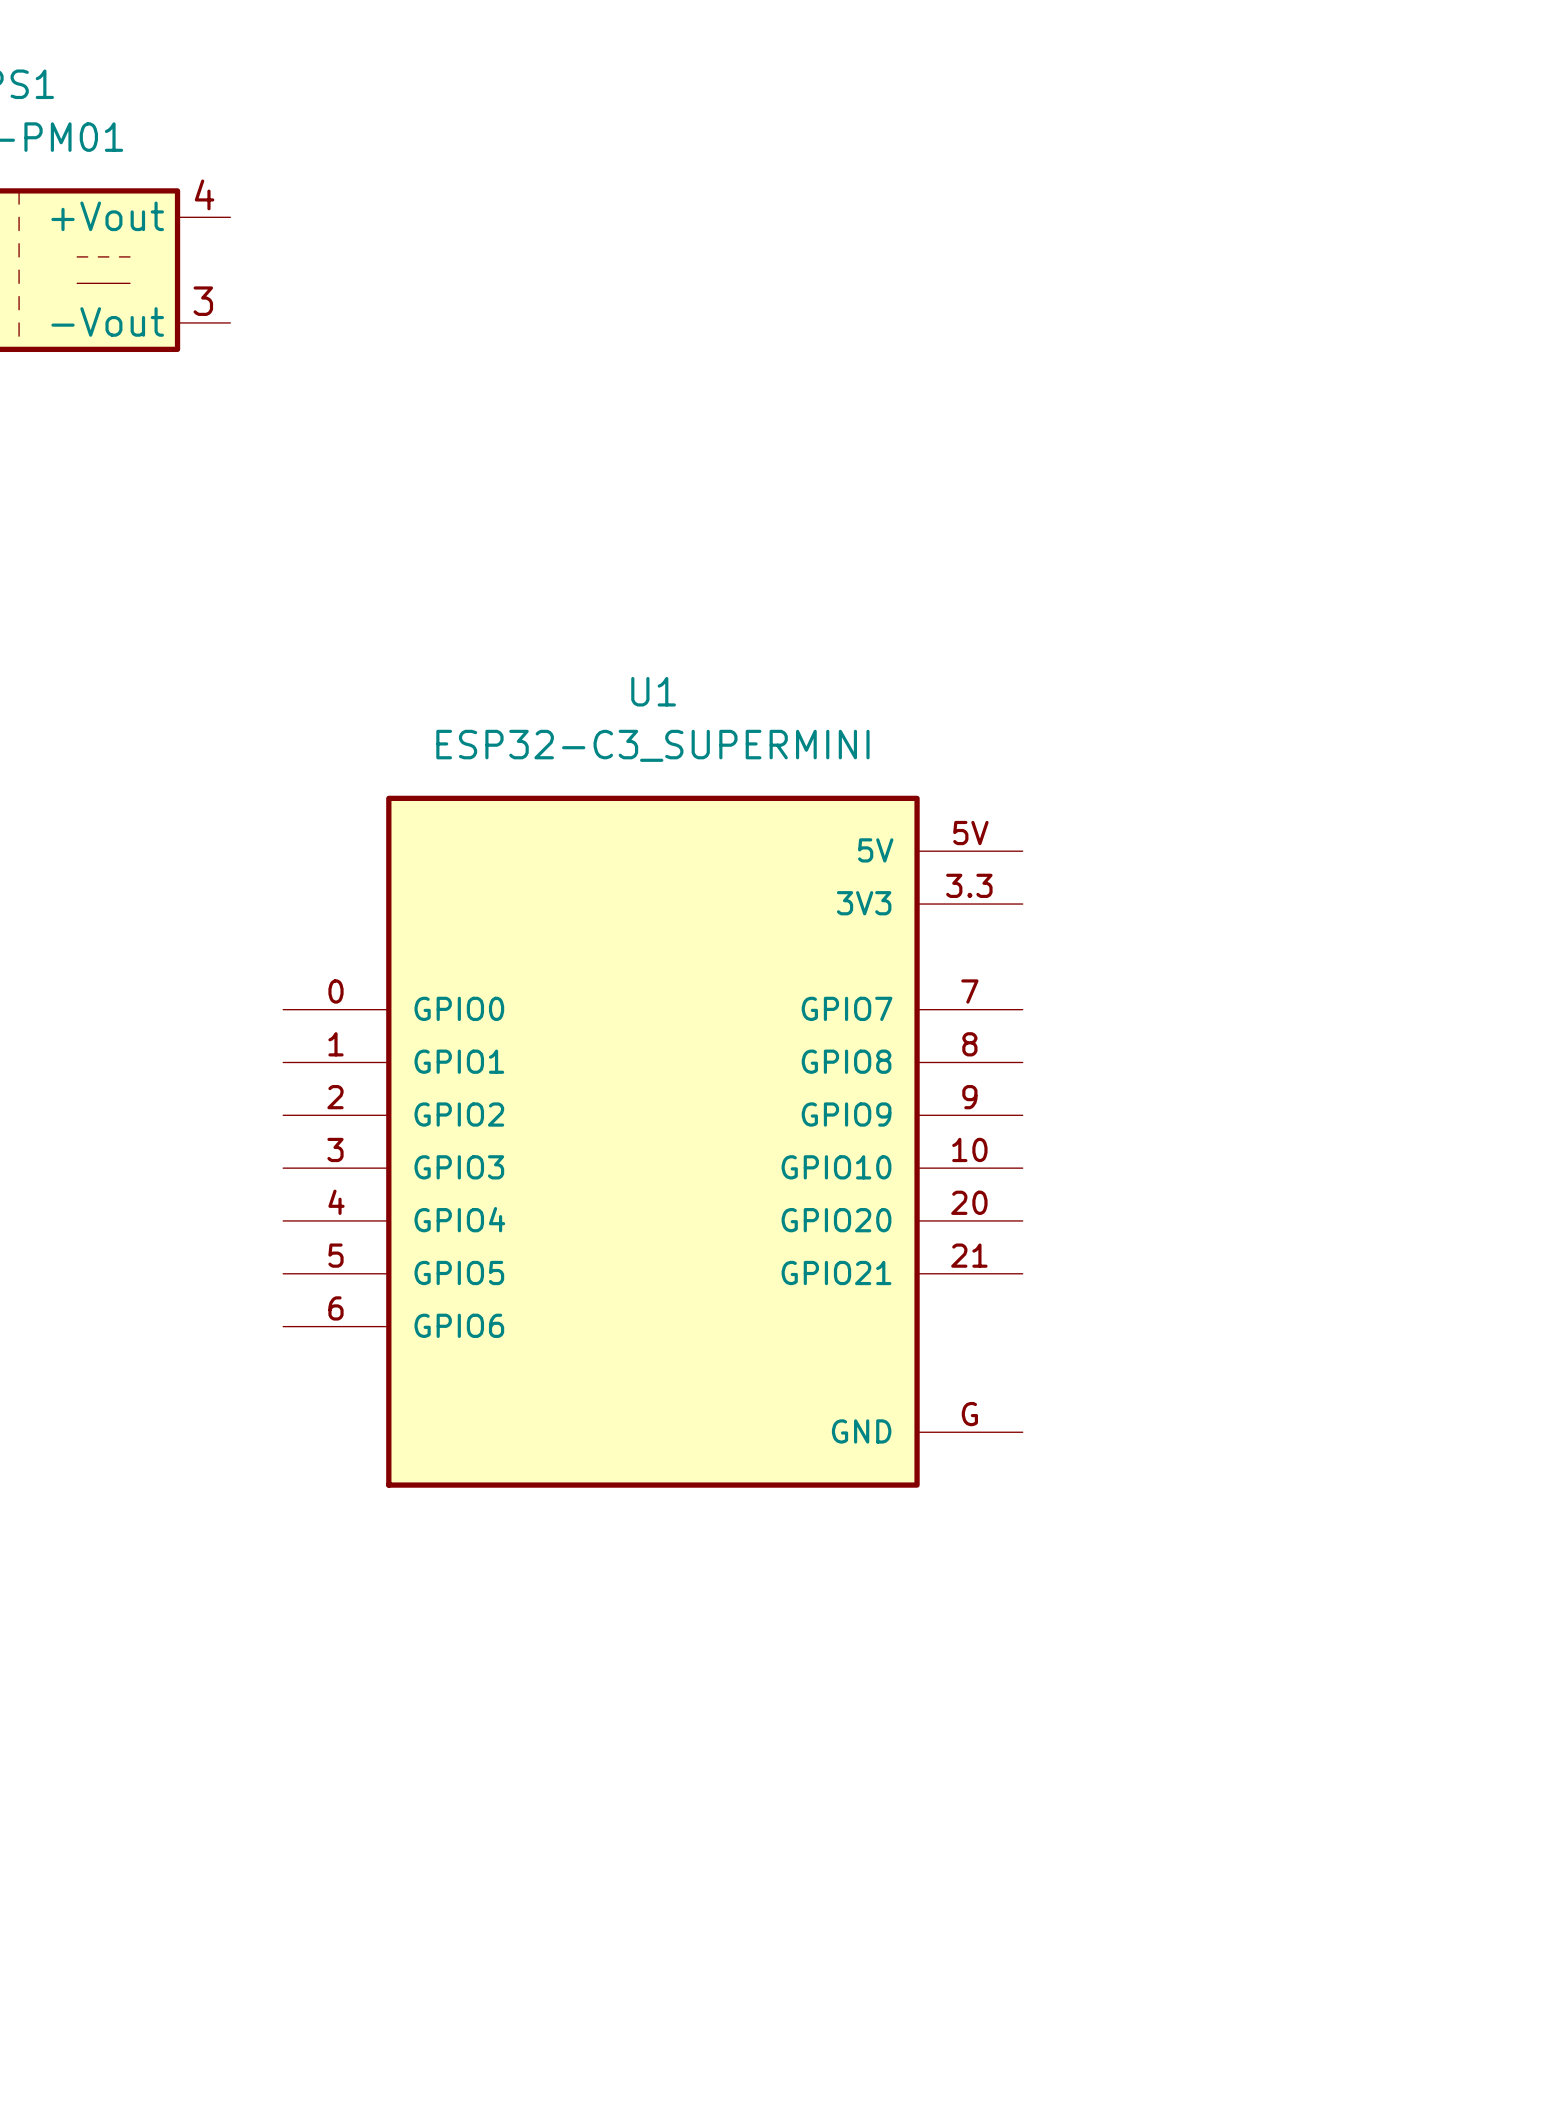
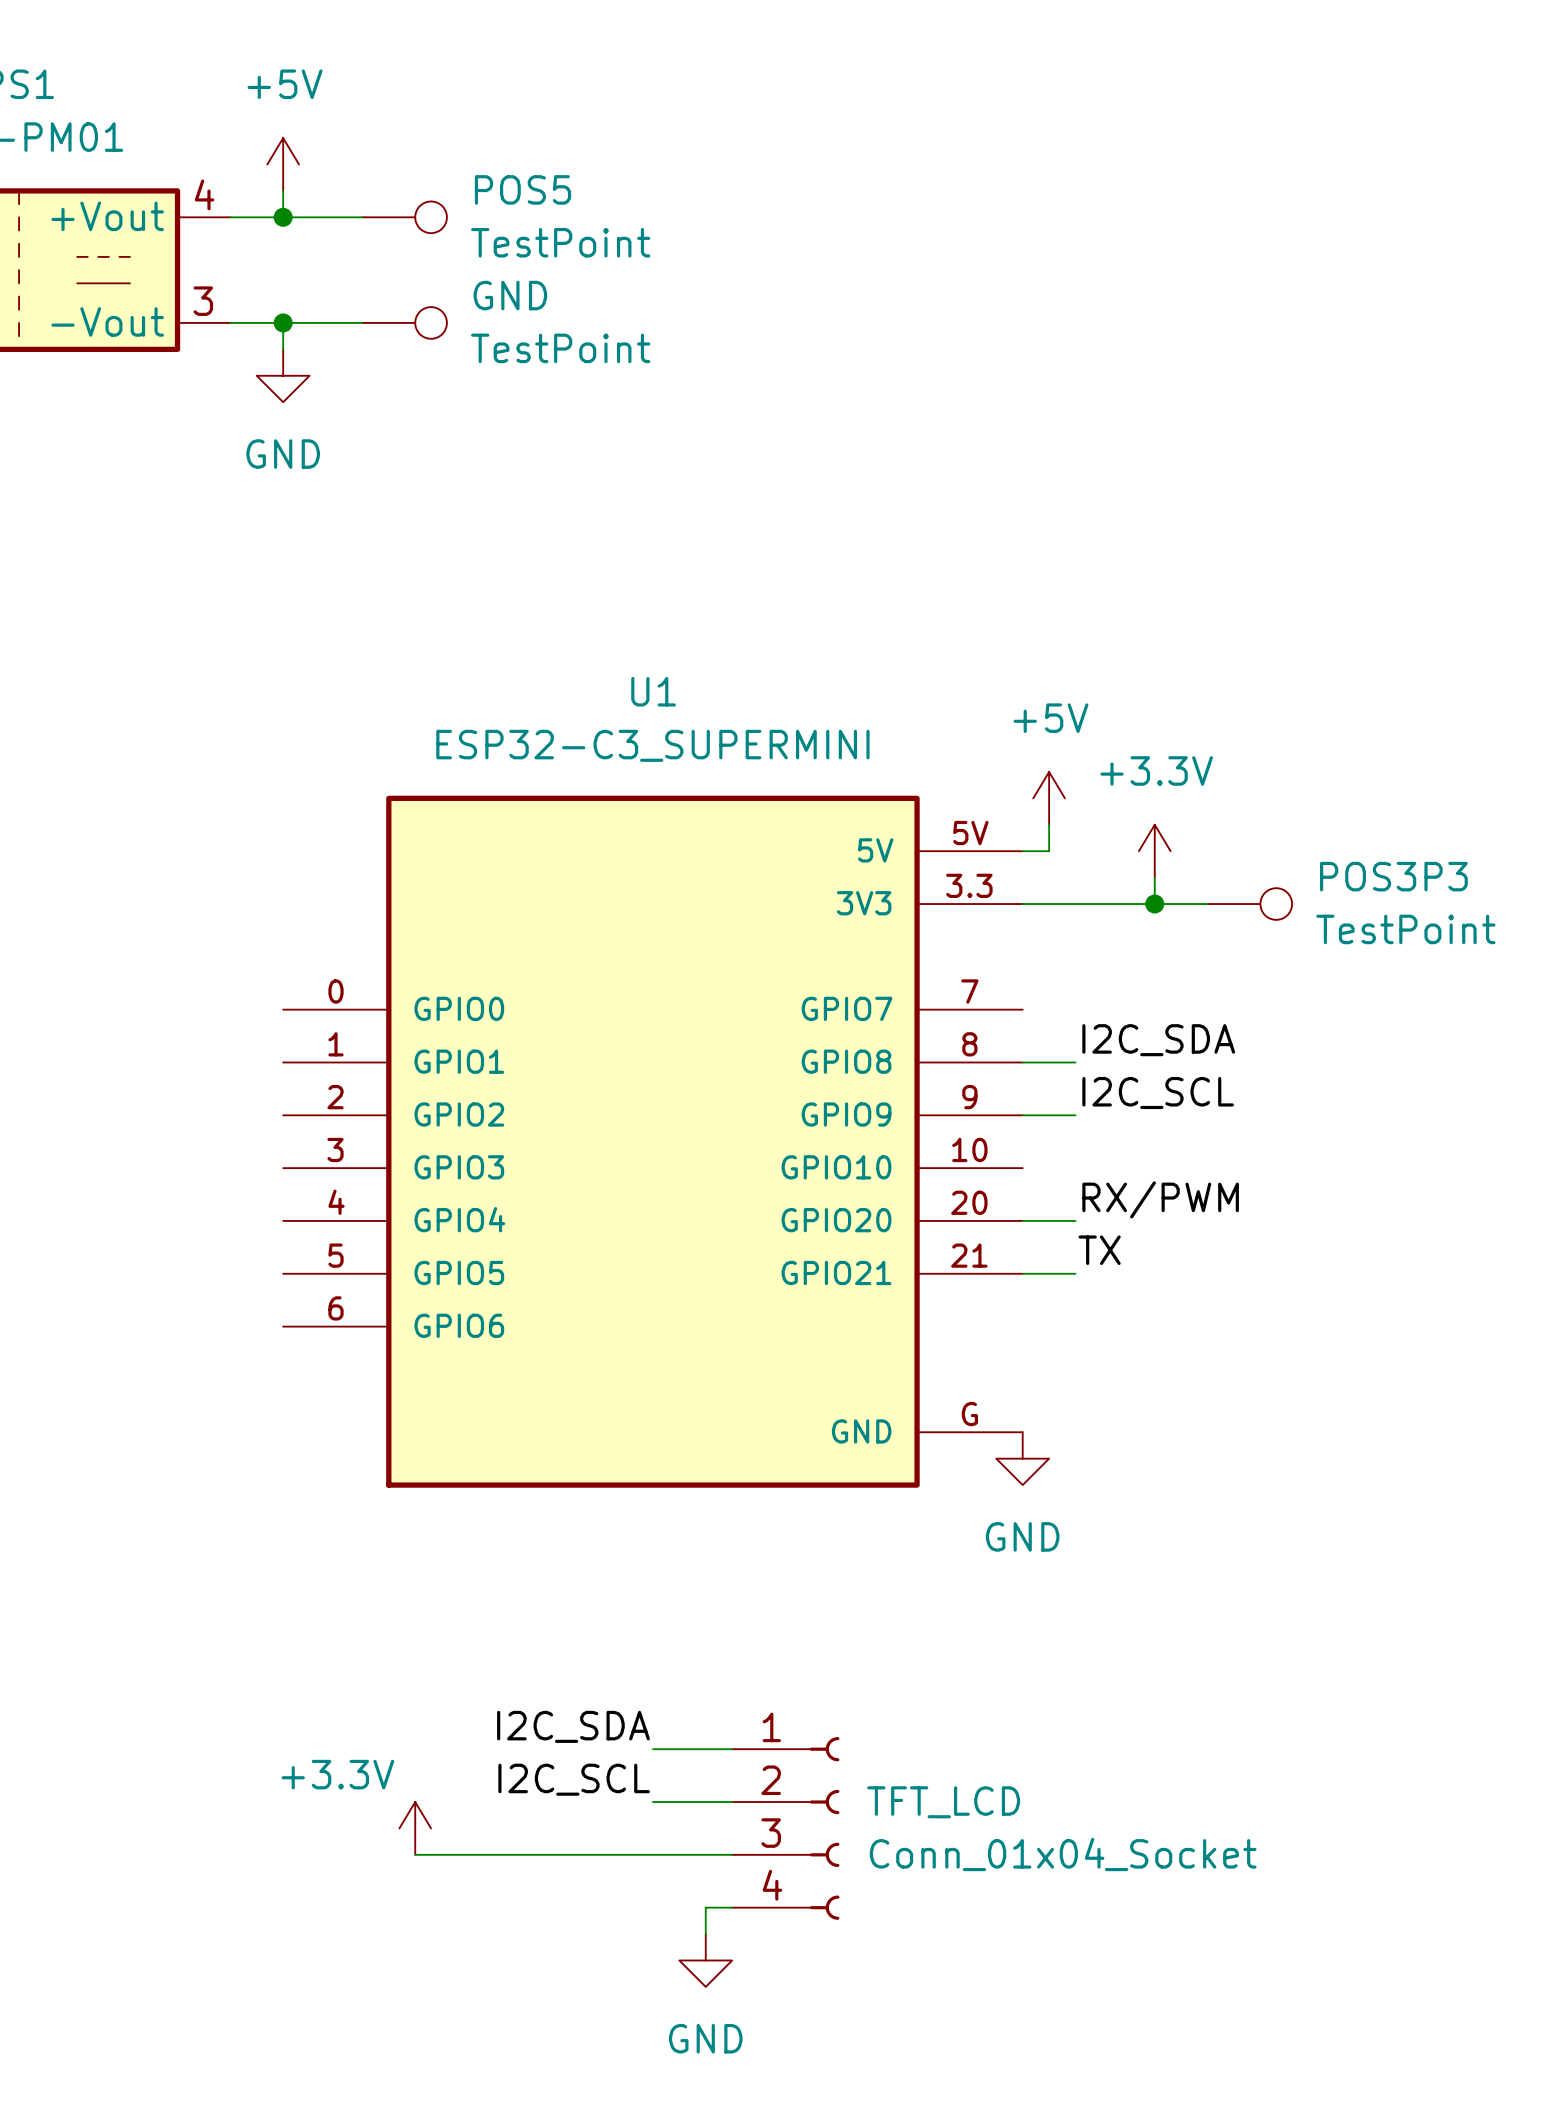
power symbol: none -> +5V (283, 164)
wire: none -> (283, 190) (283, 217)
wire: none -> (230, 217) (362, 217)
junction: none -> (283, 217)
POS5: none -> TestPoint (404, 217)
wire: none -> (230, 322) (362, 322)
wire: none -> (283, 322) (283, 349)
junction: none -> (283, 322)
GND: none -> TestPoint (404, 322)
power symbol: none -> GND (283, 375)
power symbol: none -> +5V (1049, 798)
wire: none -> (1049, 824) (1049, 851) (1022, 851)
power symbol: none -> +3.3V (1154, 851)
wire: none -> (1154, 877) (1154, 904)
wire: none -> (1022, 904) (1207, 904)
junction: none -> (1154, 904)
POS3P3: none -> TestPoint (1249, 904)
label: none -> I2C_SDA (1158, 1040)
wire: none -> (1022, 1062) (1075, 1062)
label: none -> I2C_SCL (1158, 1093)
wire: none -> (1022, 1115) (1075, 1115)
label: none -> RX/PWM (1160, 1199)
wire: none -> (1022, 1220) (1075, 1220)
label: none -> TX (1099, 1250)
wire: none -> (1022, 1273) (1075, 1273)
power symbol: none -> GND (1022, 1458)
label: none -> I2C_SDA (573, 1726)
wire: none -> (652, 1749) (732, 1749)
label: none -> I2C_SCL (574, 1779)
wire: none -> (652, 1802) (732, 1802)
power symbol: none -> +3.3V (415, 1828)
TFT_LCD: none -> Conn_01x04_Socket (785, 1828)
wire: none -> (415, 1854) (732, 1854)
wire: none -> (732, 1907) (705, 1907) (705, 1934)
power symbol: none -> GND (705, 1960)

